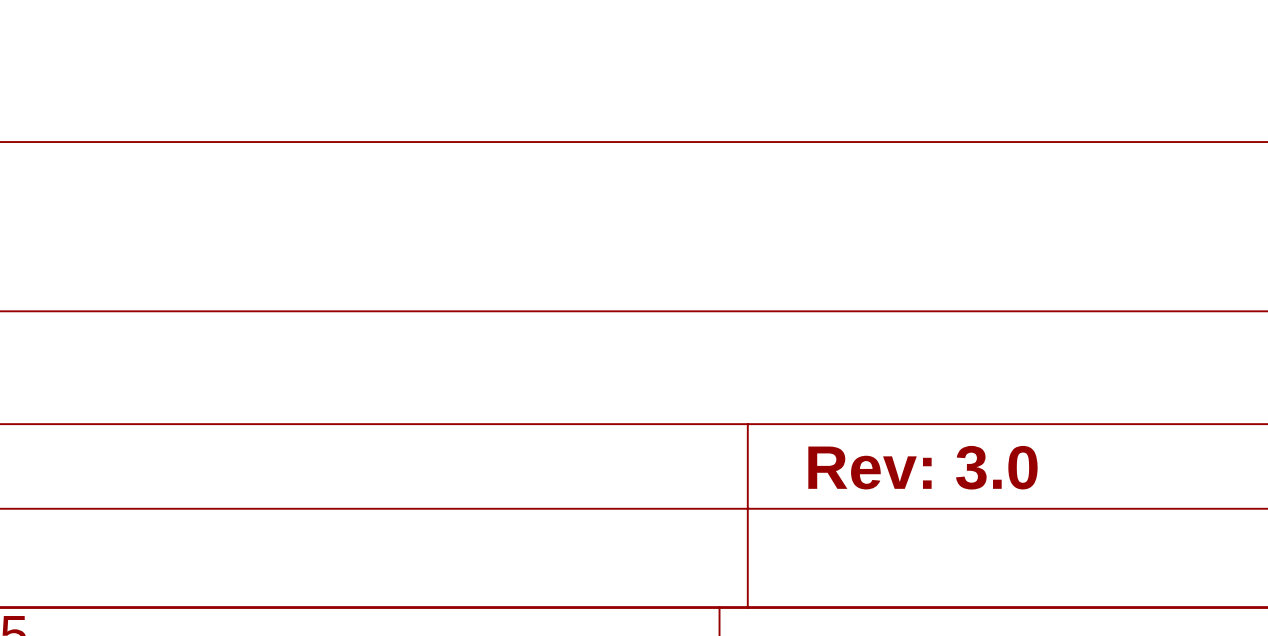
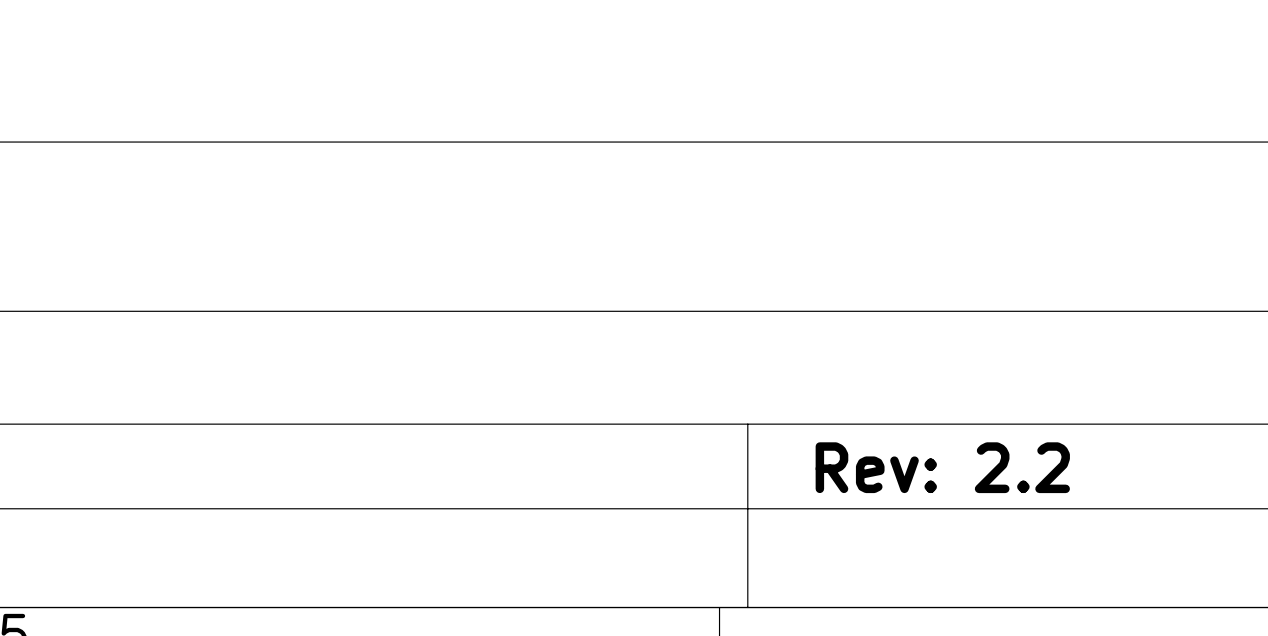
title block: Rev: 3.0 (922, 467) -> Rev: 2.2 (942, 467)

